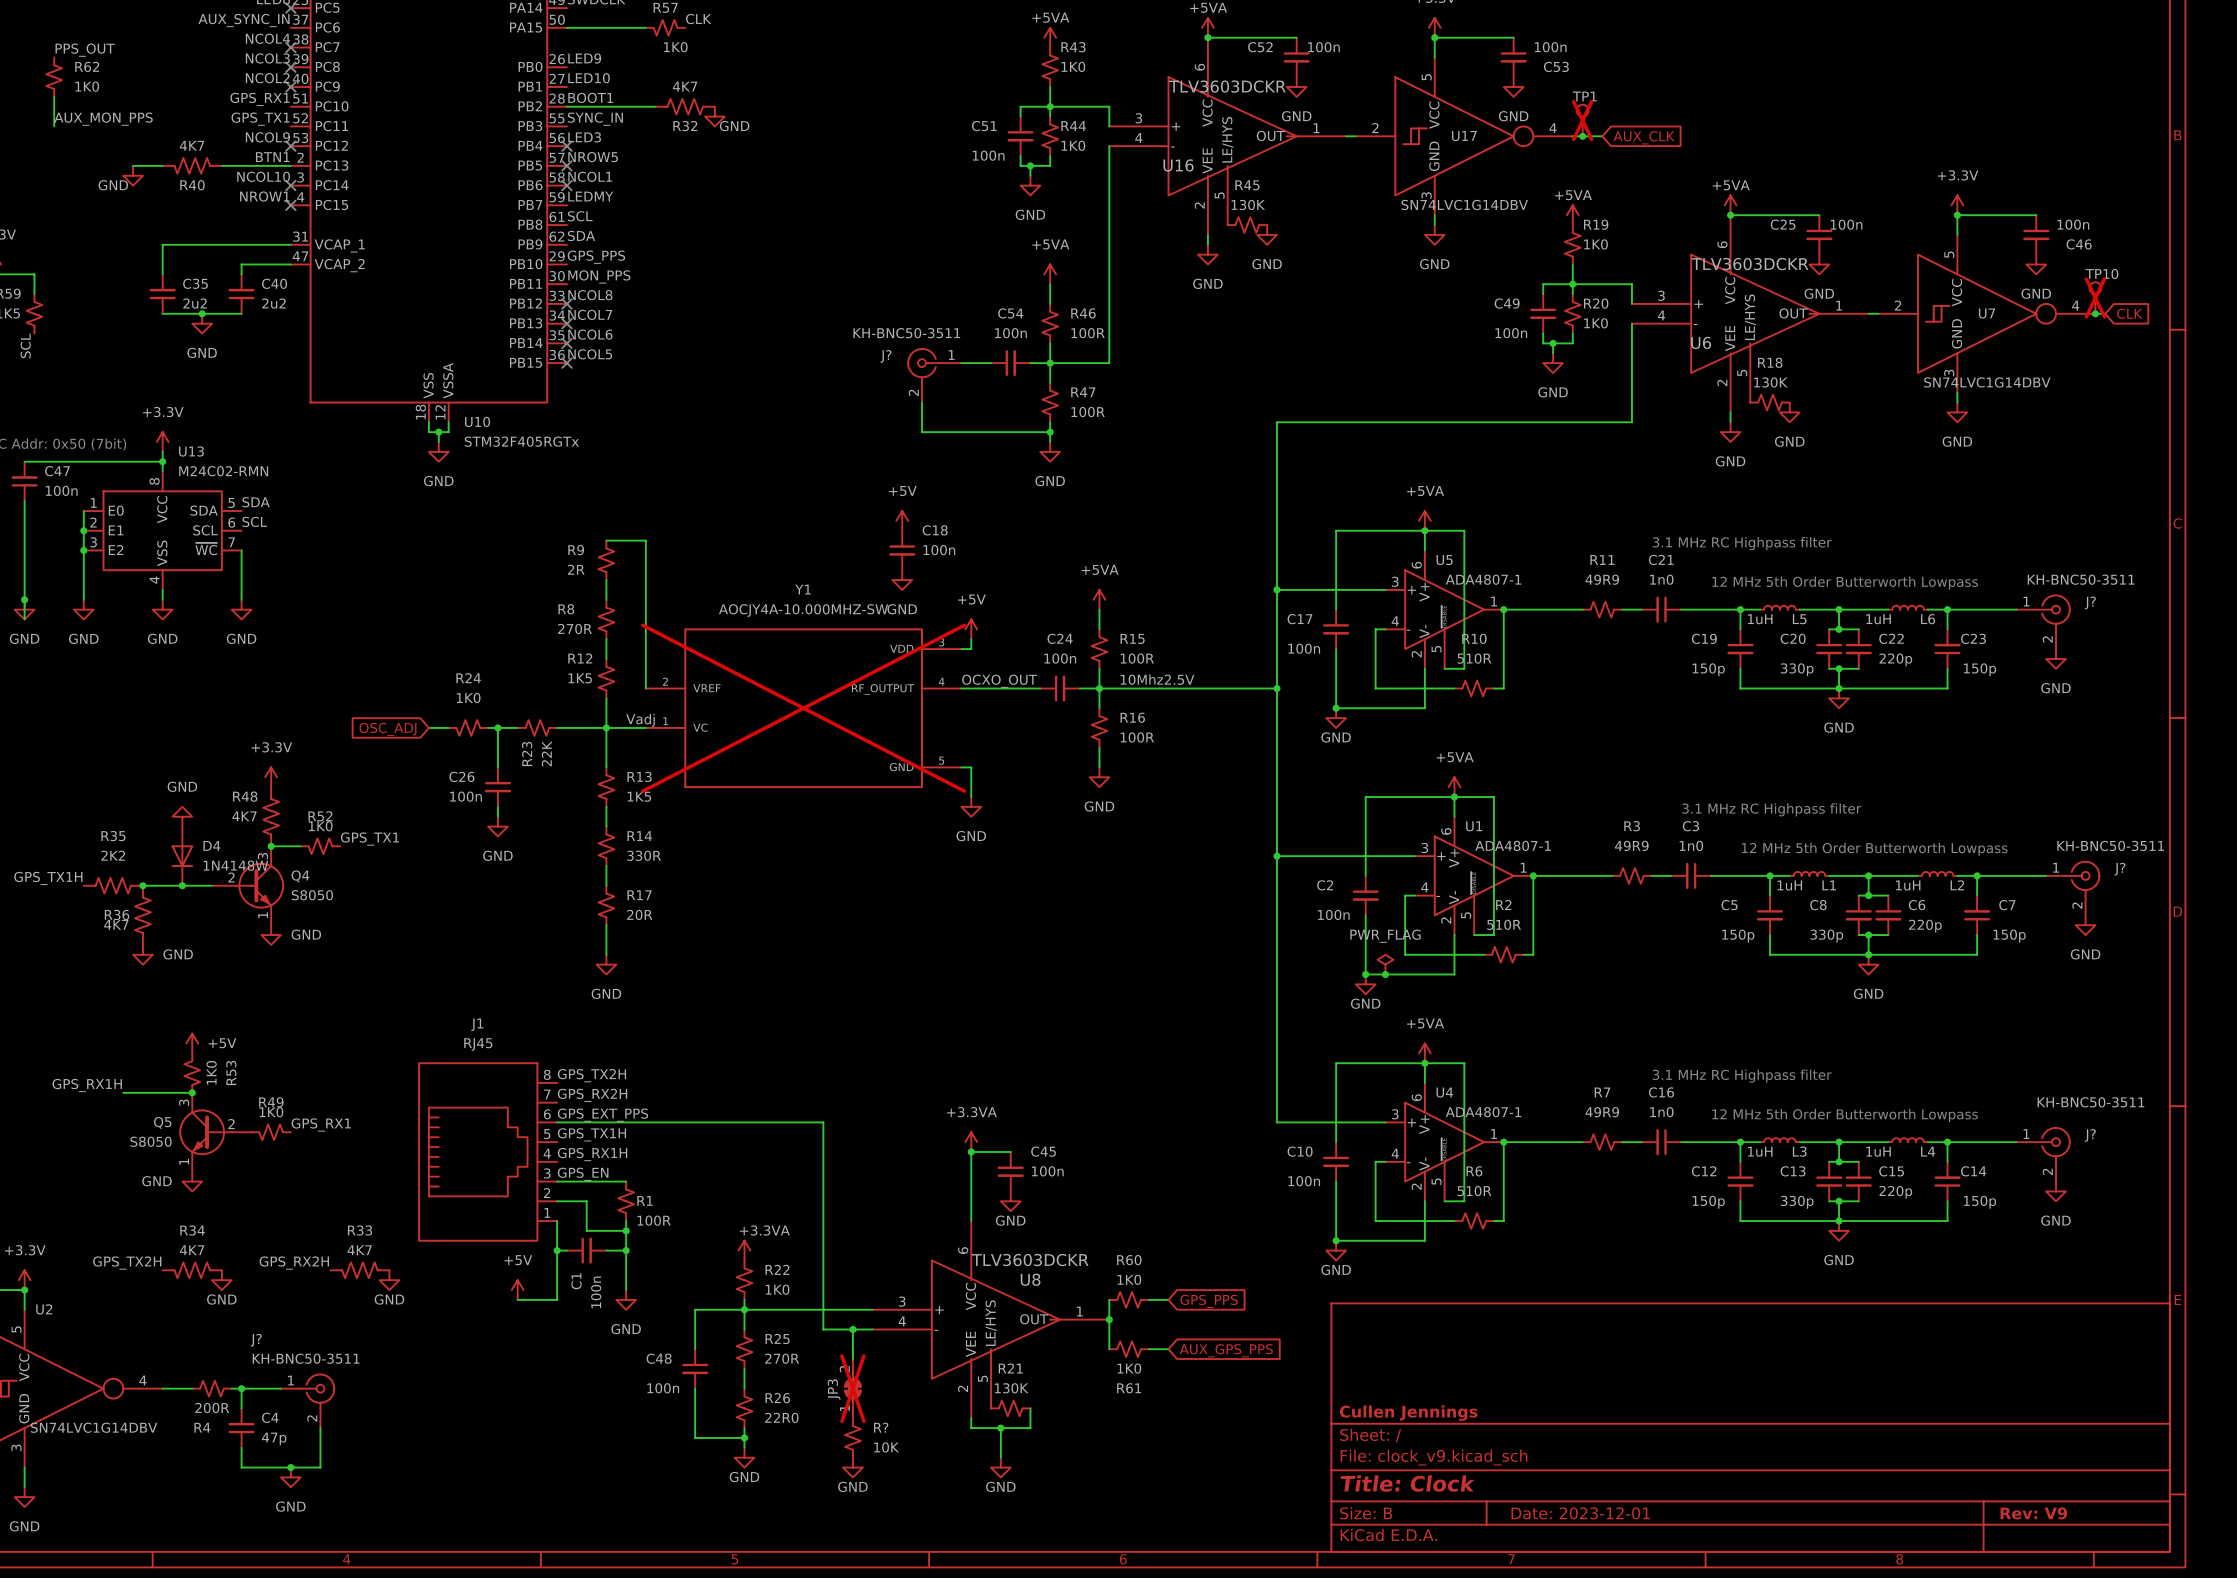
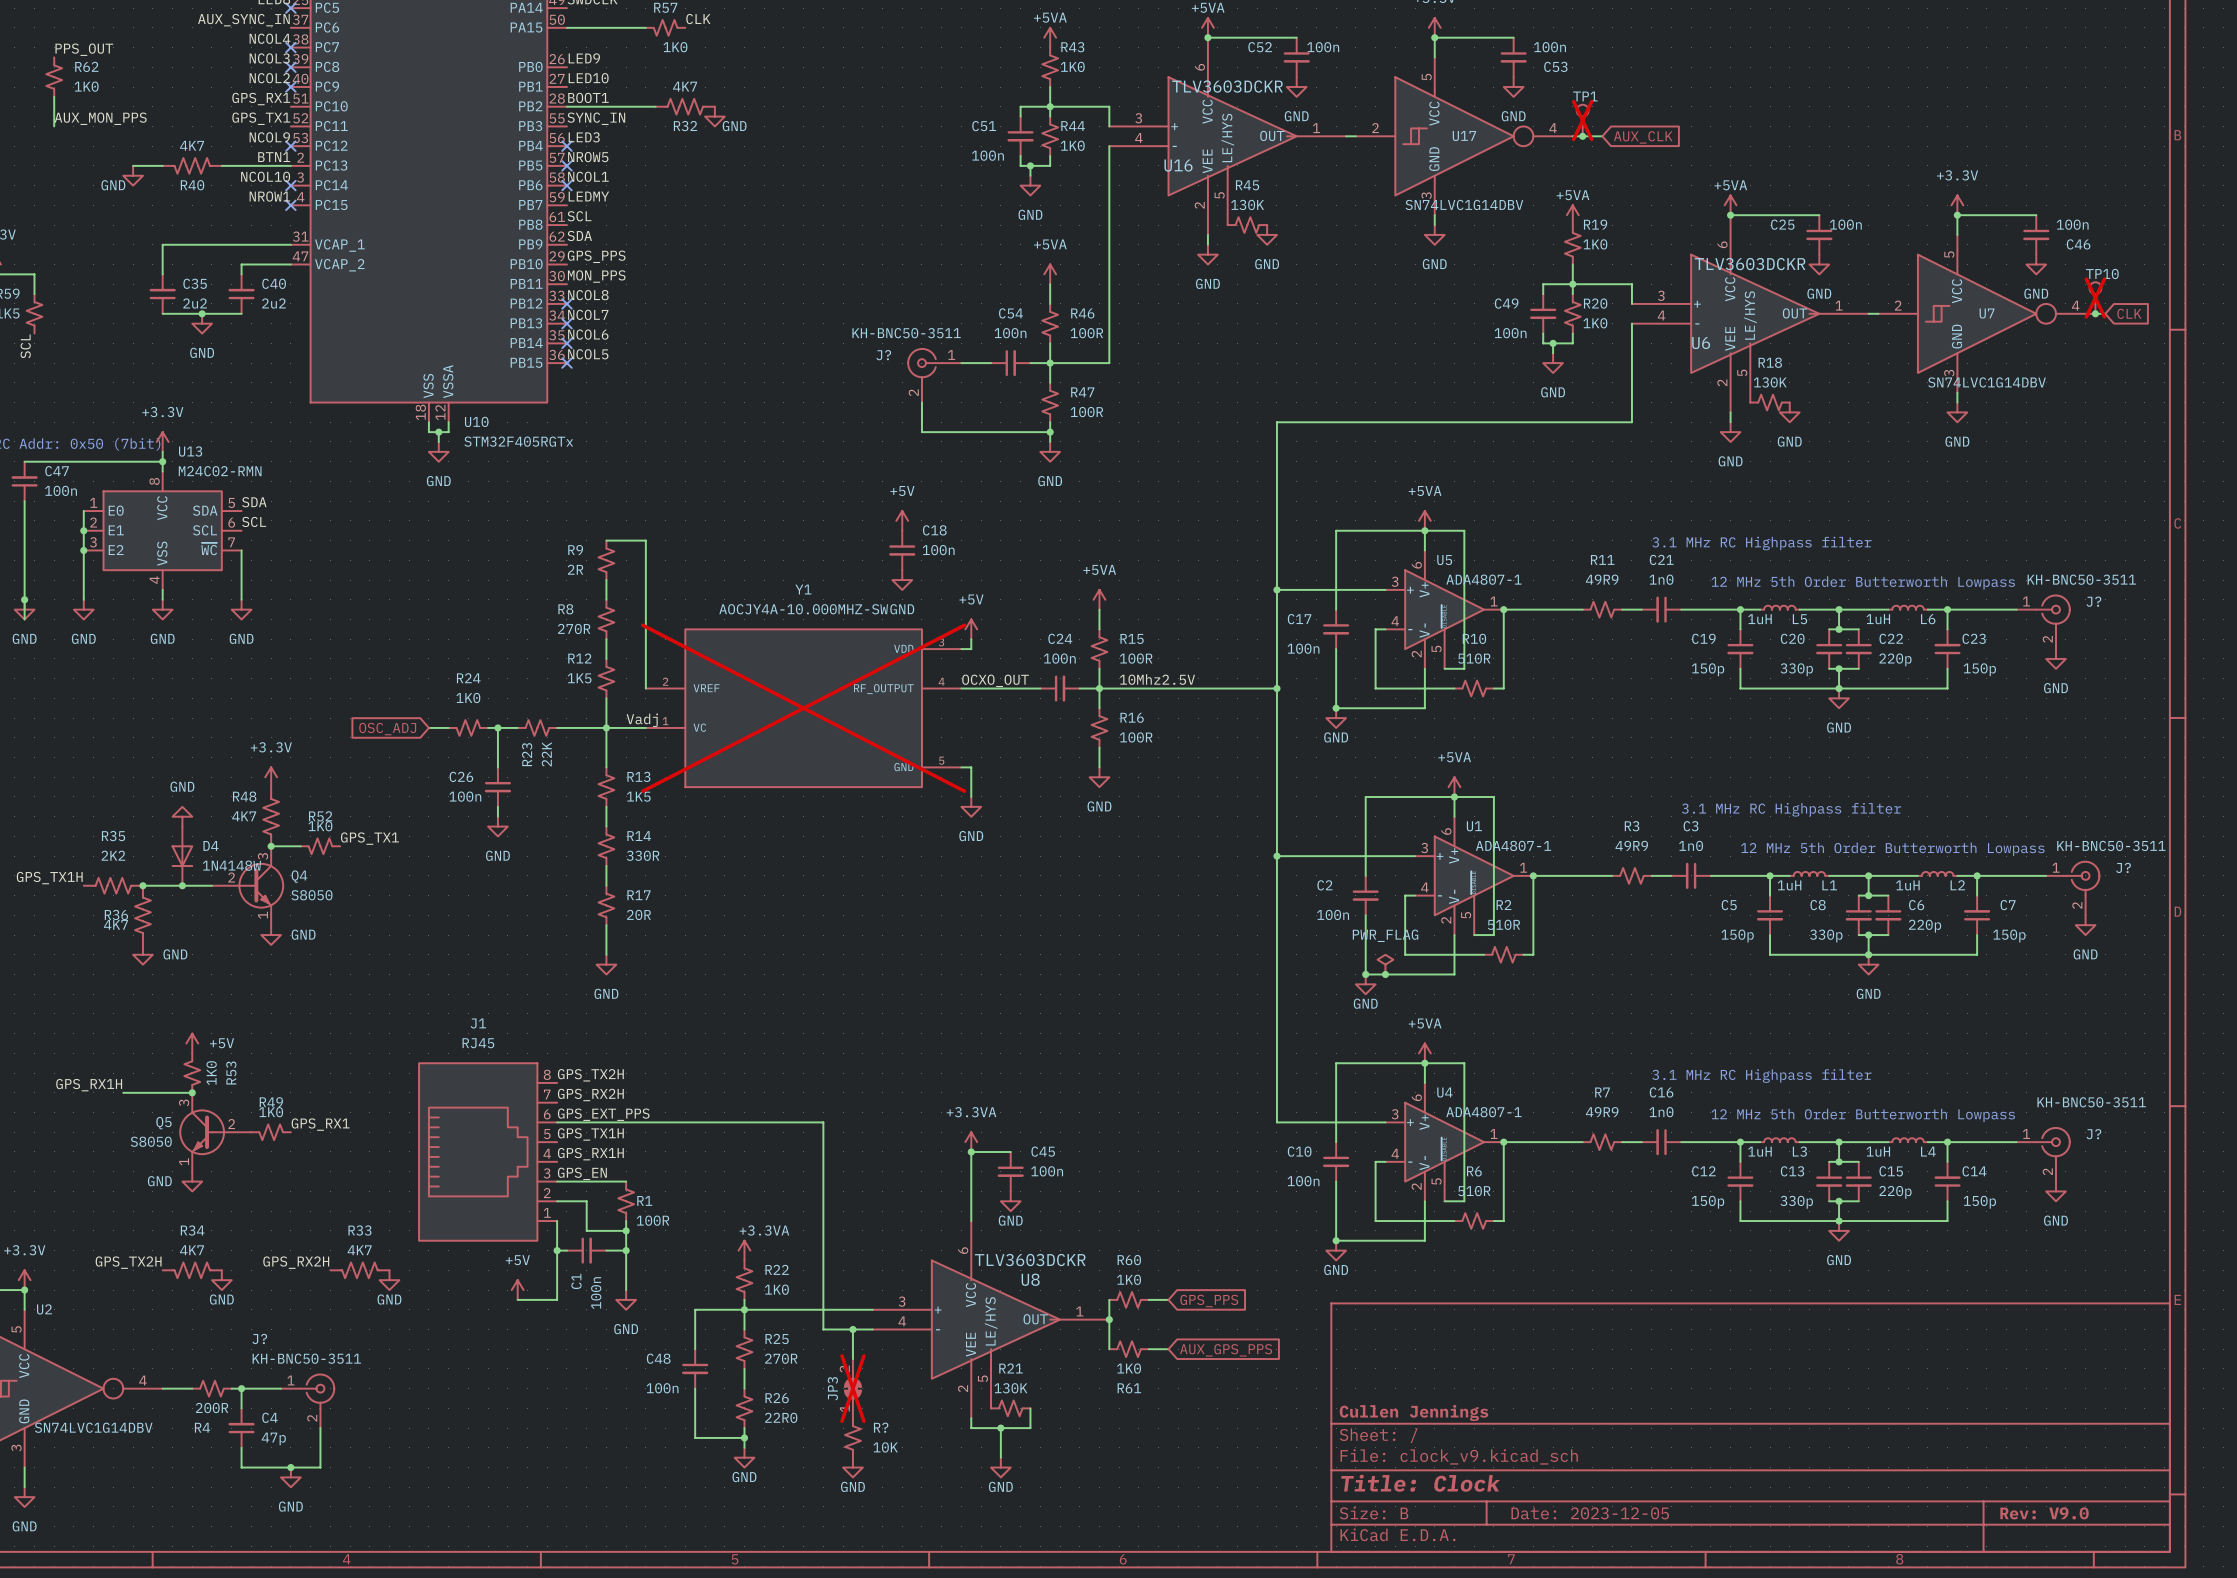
title block: Date: 2023-12-01 (1580, 1513) -> Date: 2023-12-05 (1590, 1513)
title block: Rev: V9 (2033, 1513) -> Rev: V9.0 (2044, 1513)

